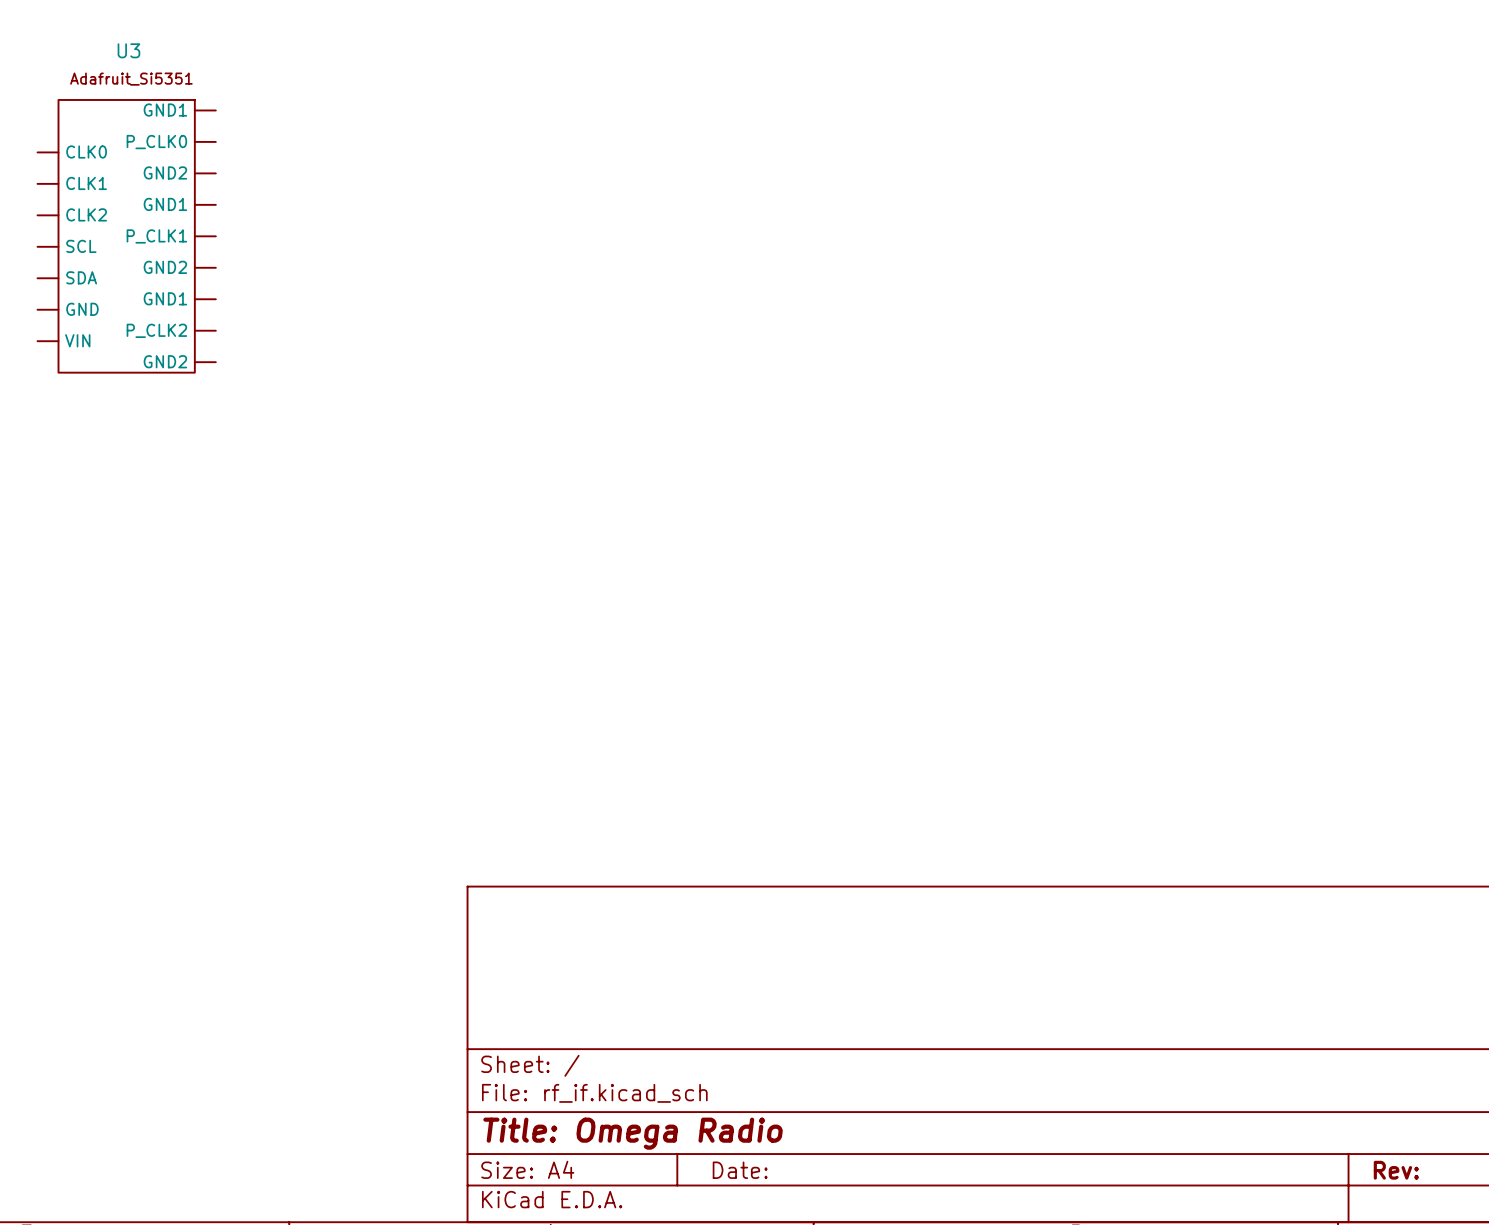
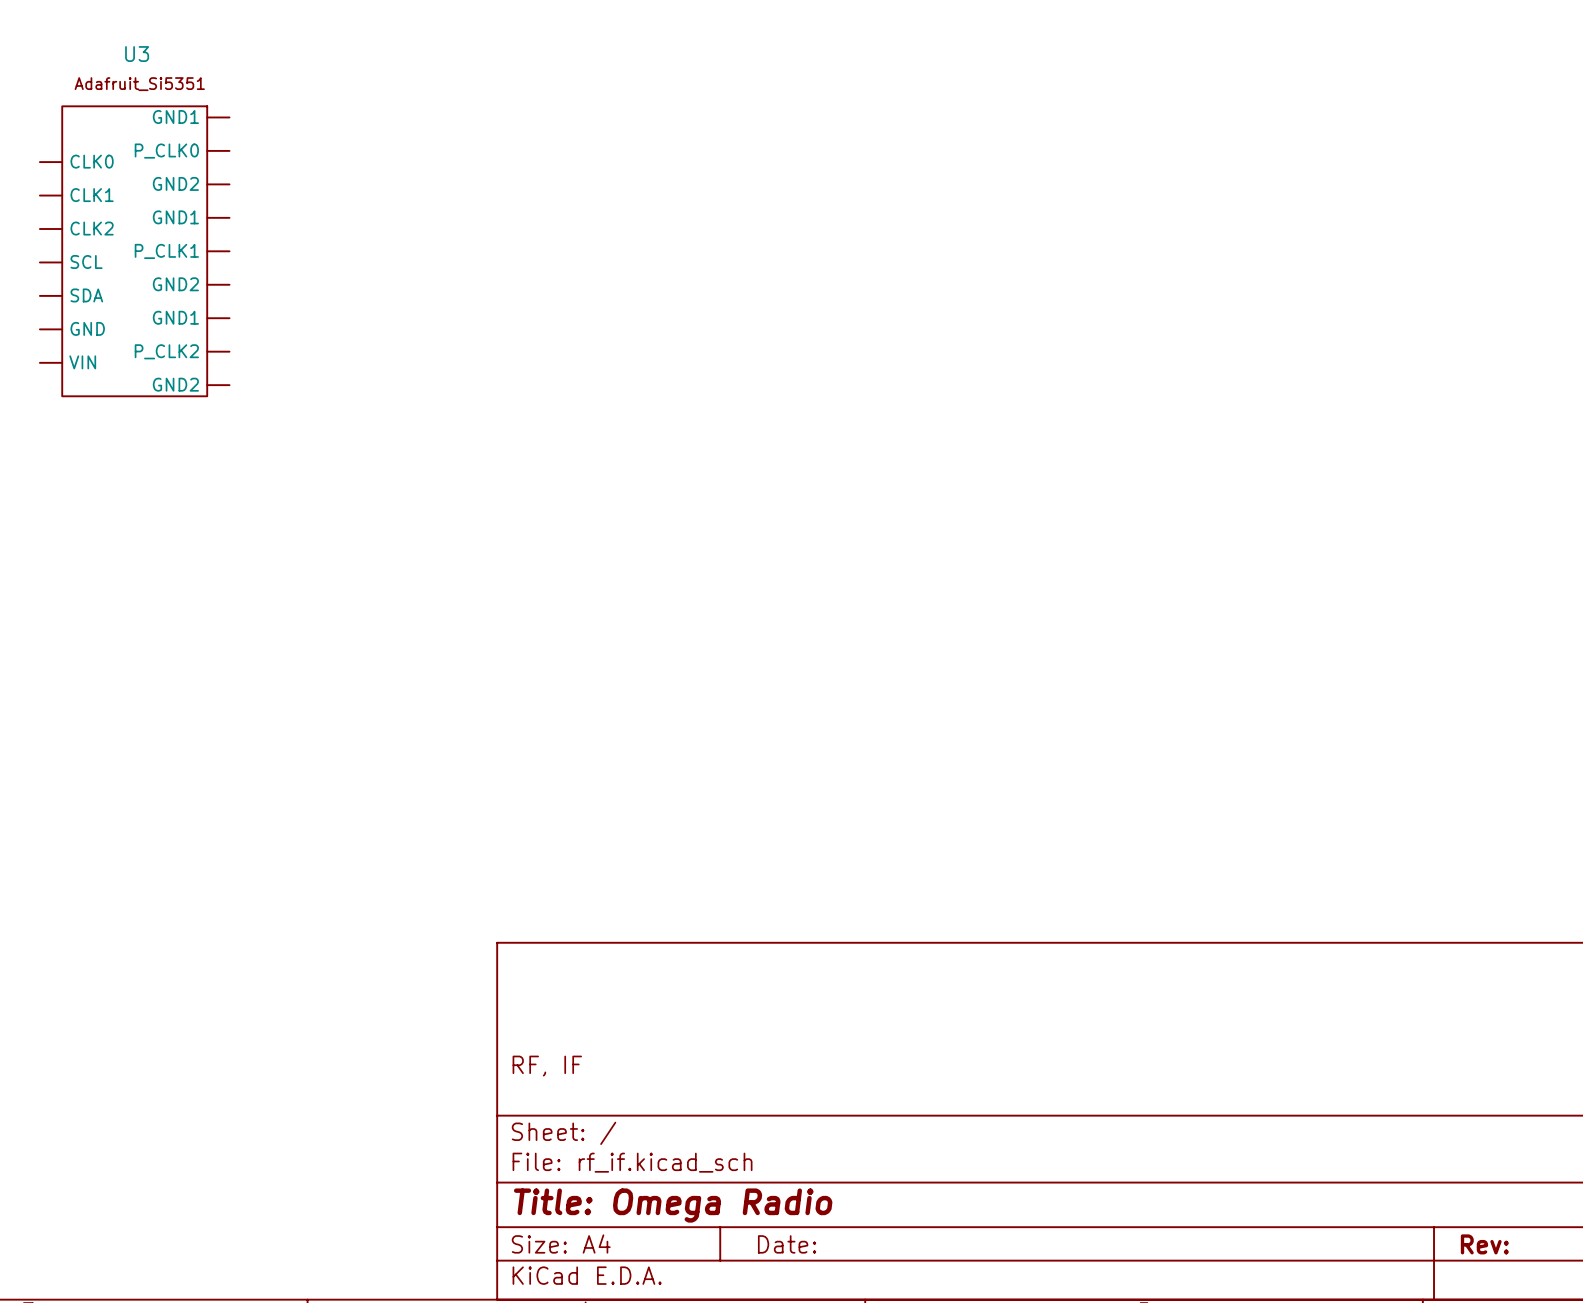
title block: none -> RF, IF (547, 1066)

